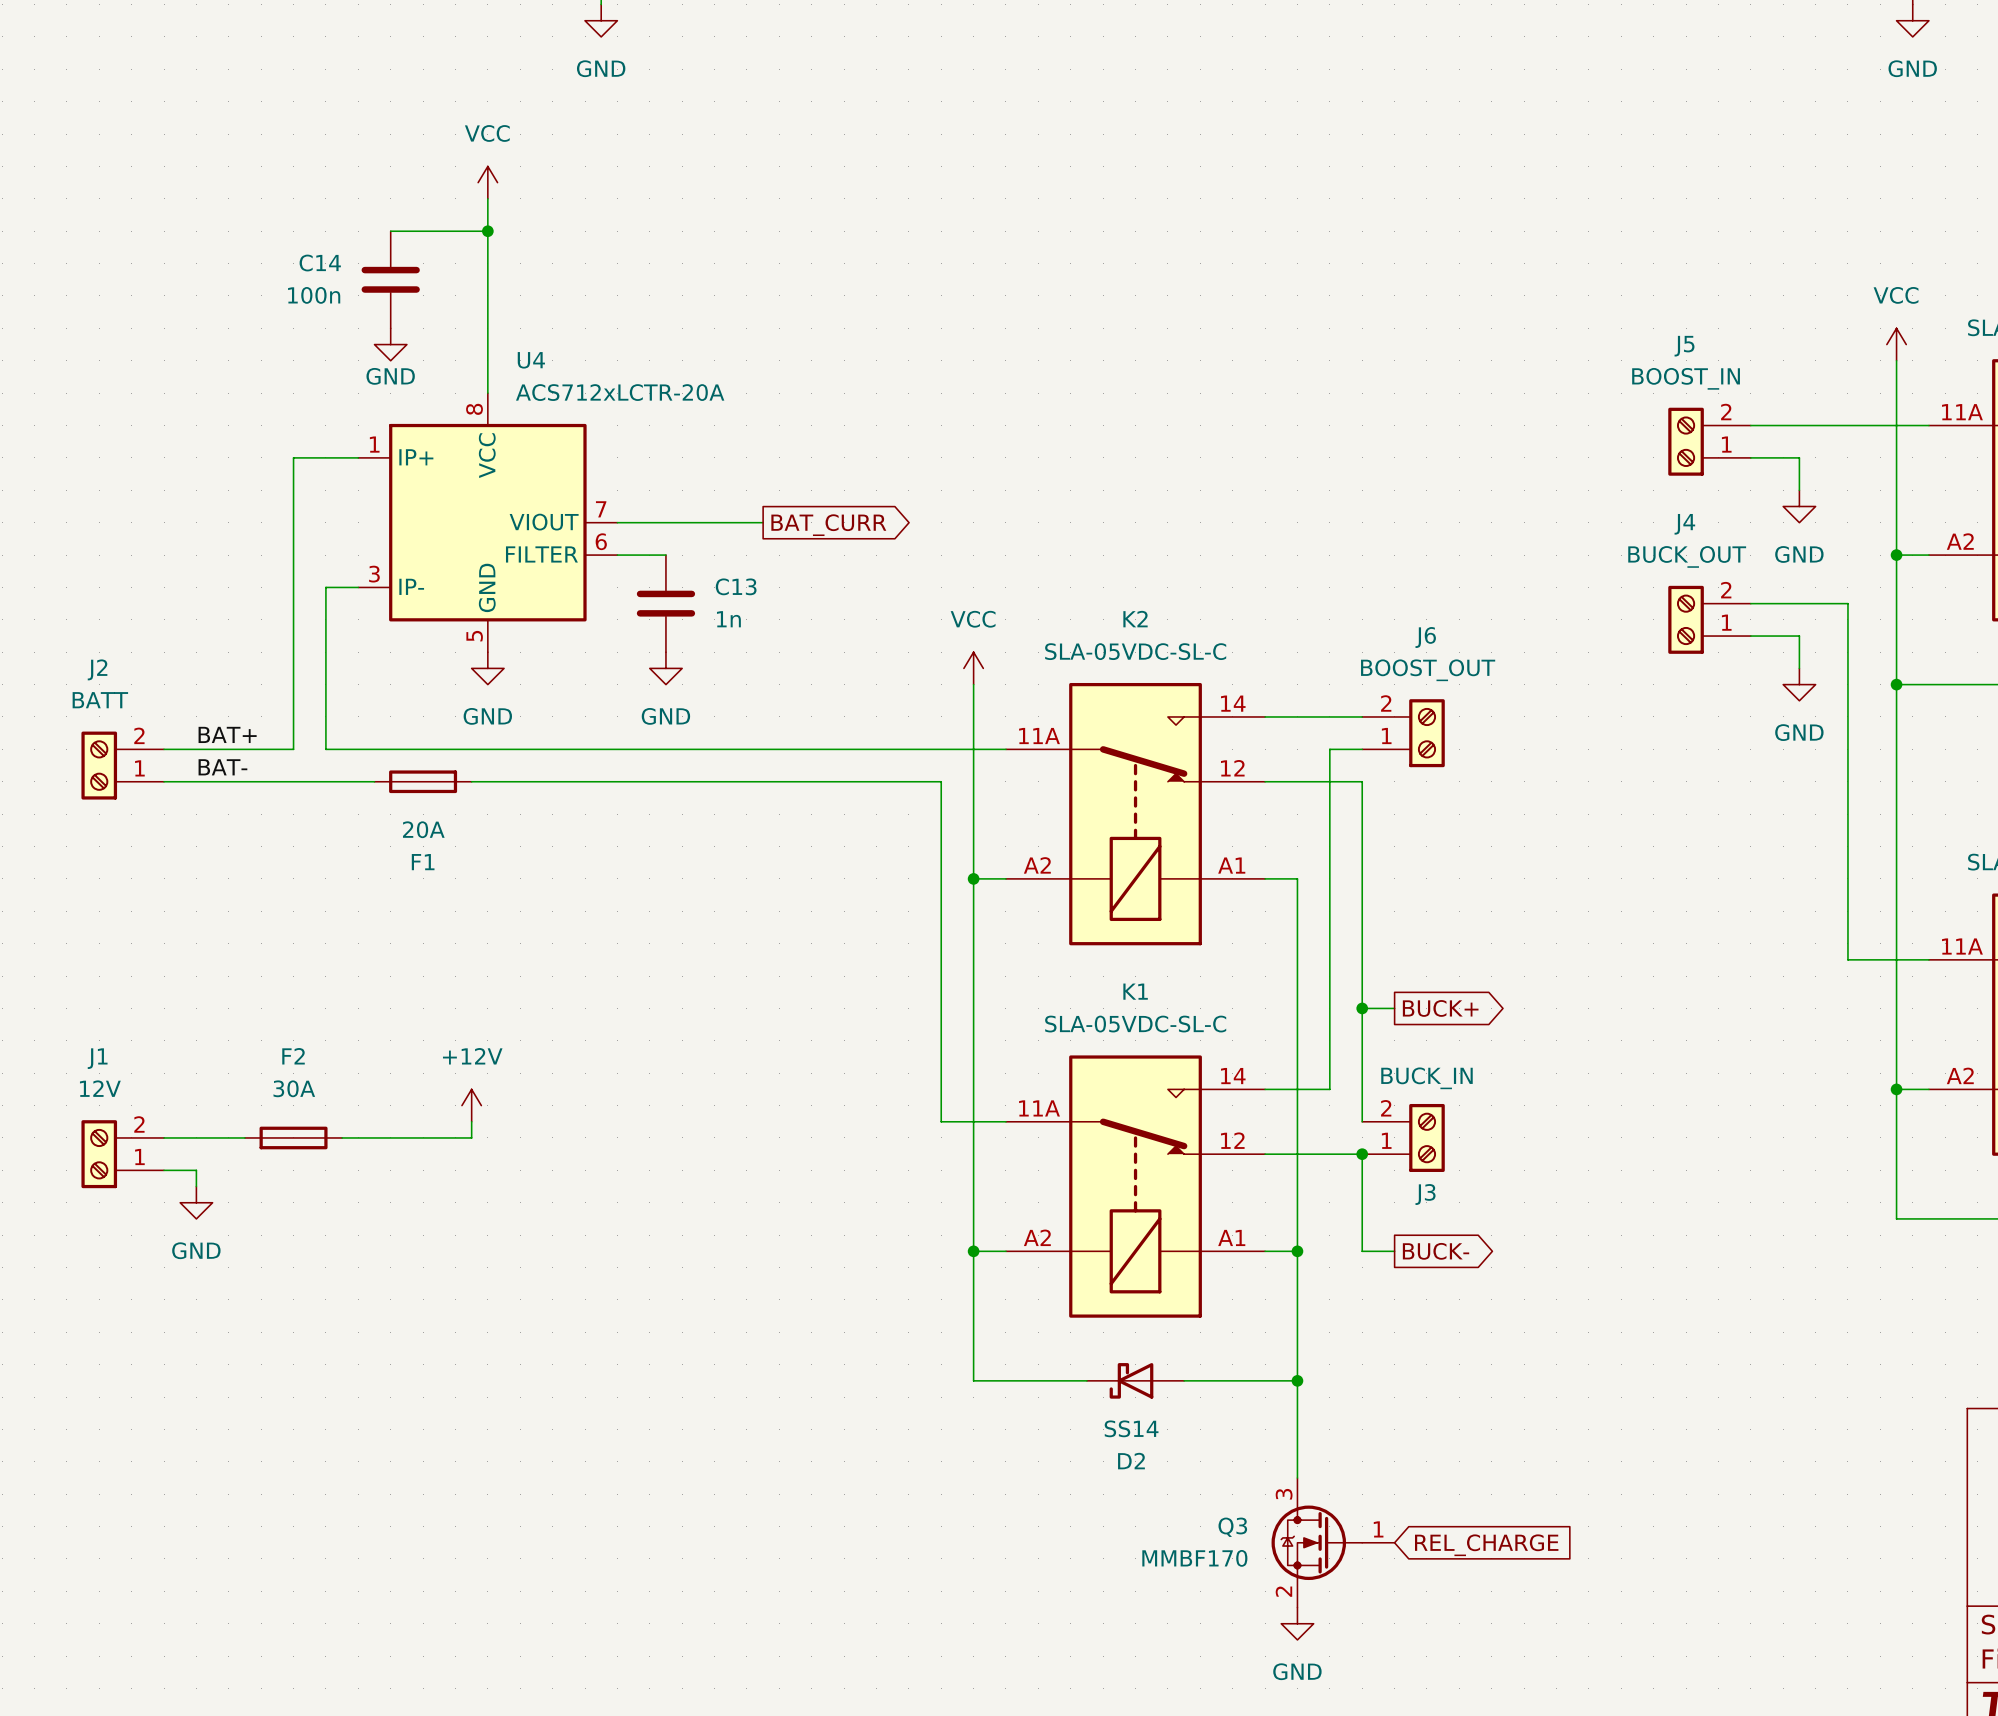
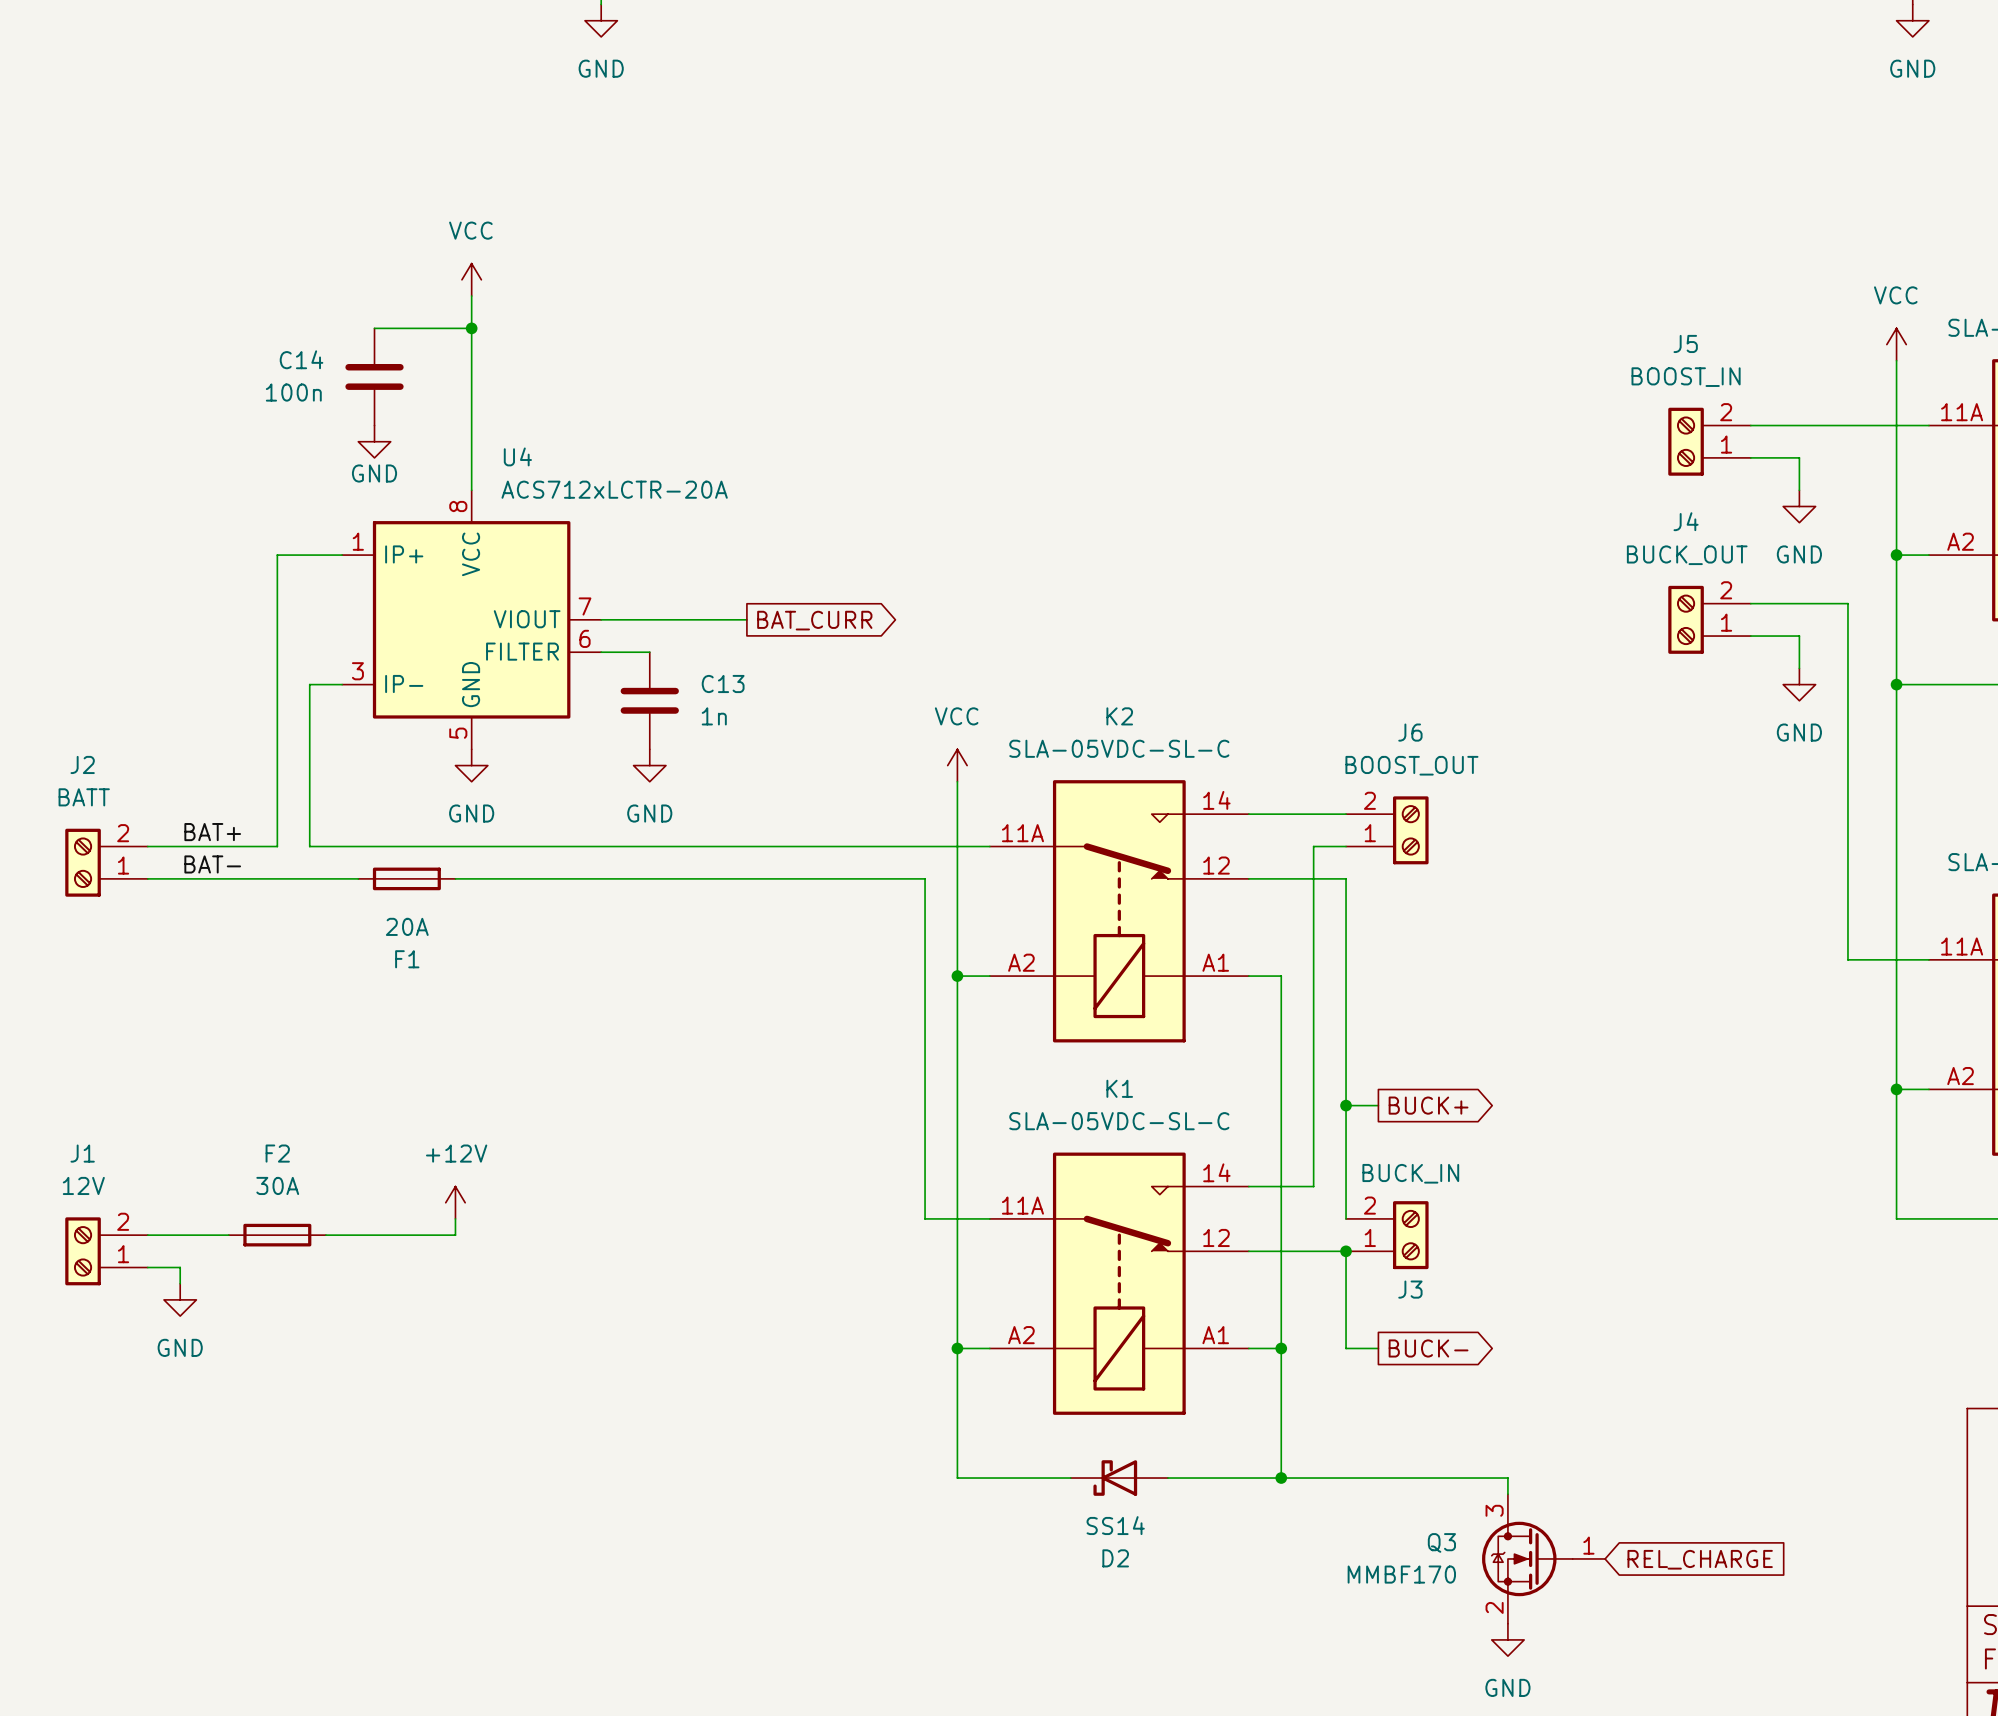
power symbol position: VCC (487, 182) -> VCC (471, 279)
wire: (487, 198) (487, 393) -> (471, 295) (471, 490)
wire: (390, 231) (487, 231) -> (374, 328) (471, 328)
junction: (487, 231) -> none
C14 position: (390, 279) -> (374, 376)
junction: none -> (471, 328)
power symbol position: GND (390, 344) -> GND (374, 441)
wire: (358, 457) (293, 457) (293, 749) (164, 749) -> (342, 555) (277, 555) (277, 846) (147, 846)
U4 position: (487, 522) -> (471, 619)
wire: (617, 522) (763, 522) -> (601, 619) (746, 619)
global label position: BAT_CURR (828, 525) -> BAT_CURR (814, 620)
wire: (617, 555) (665, 555) -> (601, 652) (649, 652)
wire: (358, 587) (325, 587) (325, 749) (1005, 749) -> (342, 684) (309, 684) (309, 846) (989, 846)
C13 position: (665, 603) -> (649, 700)
power symbol: GND (487, 668) -> none
power symbol: GND (665, 668) -> none
power symbol position: VCC (973, 668) -> VCC (957, 765)
wire: (973, 684) (973, 1380) (1086, 1380) -> (957, 781) (957, 1478) (1070, 1478)
wire: (1265, 716) (1362, 716) -> (1248, 814) (1346, 814)
J6 position: (1403, 733) -> (1387, 830)
label position: BAT+ (227, 734) -> BAT+ (212, 832)
wire: (1362, 749) (1329, 749) (1329, 1089) (1265, 1089) -> (1346, 846) (1313, 846) (1313, 1186) (1248, 1186)
J2 position: (122, 765) -> (106, 862)
power symbol: none -> GND (471, 765)
power symbol: none -> GND (649, 765)
label position: BAT- (222, 767) -> BAT- (212, 864)
wire: (164, 781) (374, 781) -> (147, 878) (358, 878)
F1 position: (423, 781) -> (406, 878)
wire: (471, 781) (941, 781) (941, 1121) (1005, 1121) -> (455, 878) (925, 878) (925, 1218) (989, 1218)
wire: (1265, 781) (1362, 781) (1362, 1121) -> none
K2 position: (1135, 814) -> (1119, 911)
wire: (973, 878) (1005, 878) -> (957, 976) (989, 976)
junction: (973, 878) -> none
wire: (1297, 878) (1297, 1478) -> (1297, 878) (1346, 878) (1346, 1218)
junction: none -> (957, 976)
wire: none -> (1248, 976) (1281, 976) (1281, 1478)
wire: (1362, 1008) (1394, 1008) -> (1346, 1105) (1378, 1105)
junction: (1362, 1008) -> none
global label position: BUCK+ (1440, 1008) -> BUCK+ (1428, 1105)
power symbol position: +12V (471, 1105) -> +12V (455, 1202)
junction: none -> (1346, 1105)
wire: (471, 1121) (471, 1137) (342, 1137) -> (455, 1218) (455, 1235) (325, 1235)
wire: (164, 1137) (244, 1137) -> (147, 1235) (228, 1235)
F2 position: (293, 1137) -> (277, 1235)
J3 position: (1403, 1137) -> (1387, 1235)
J1 position: (122, 1154) -> (106, 1251)
wire: (1265, 1154) (1362, 1154) (1362, 1251) (1394, 1251) -> none
junction: (1362, 1154) -> none
wire: (164, 1170) (196, 1170) (196, 1186) -> (147, 1267) (180, 1267) (180, 1283)
K1 position: (1135, 1186) -> (1119, 1283)
power symbol position: GND (196, 1202) -> GND (180, 1299)
wire: (973, 1251) (1005, 1251) -> (957, 1348) (989, 1348)
junction: (973, 1251) -> none
wire: none -> (1297, 1251) (1346, 1251) (1346, 1348) (1378, 1348)
junction position: (1297, 1251) -> (1346, 1251)
global label position: BUCK- (1436, 1251) -> BUCK- (1428, 1348)
junction: none -> (957, 1348)
wire: none -> (1248, 1348) (1281, 1348)
D2 position: (1135, 1380) -> (1119, 1478)
wire: (1184, 1380) (1297, 1380) -> none
junction position: (1297, 1380) -> (1281, 1348)
wire: none -> (1167, 1478) (1507, 1478) (1507, 1494)
junction: none -> (1281, 1478)
Q3 position: (1333, 1542) -> (1543, 1558)
global label position: REL_CHARGE (1486, 1545) -> REL_CHARGE (1700, 1559)
power symbol position: GND (1297, 1623) -> GND (1507, 1639)

